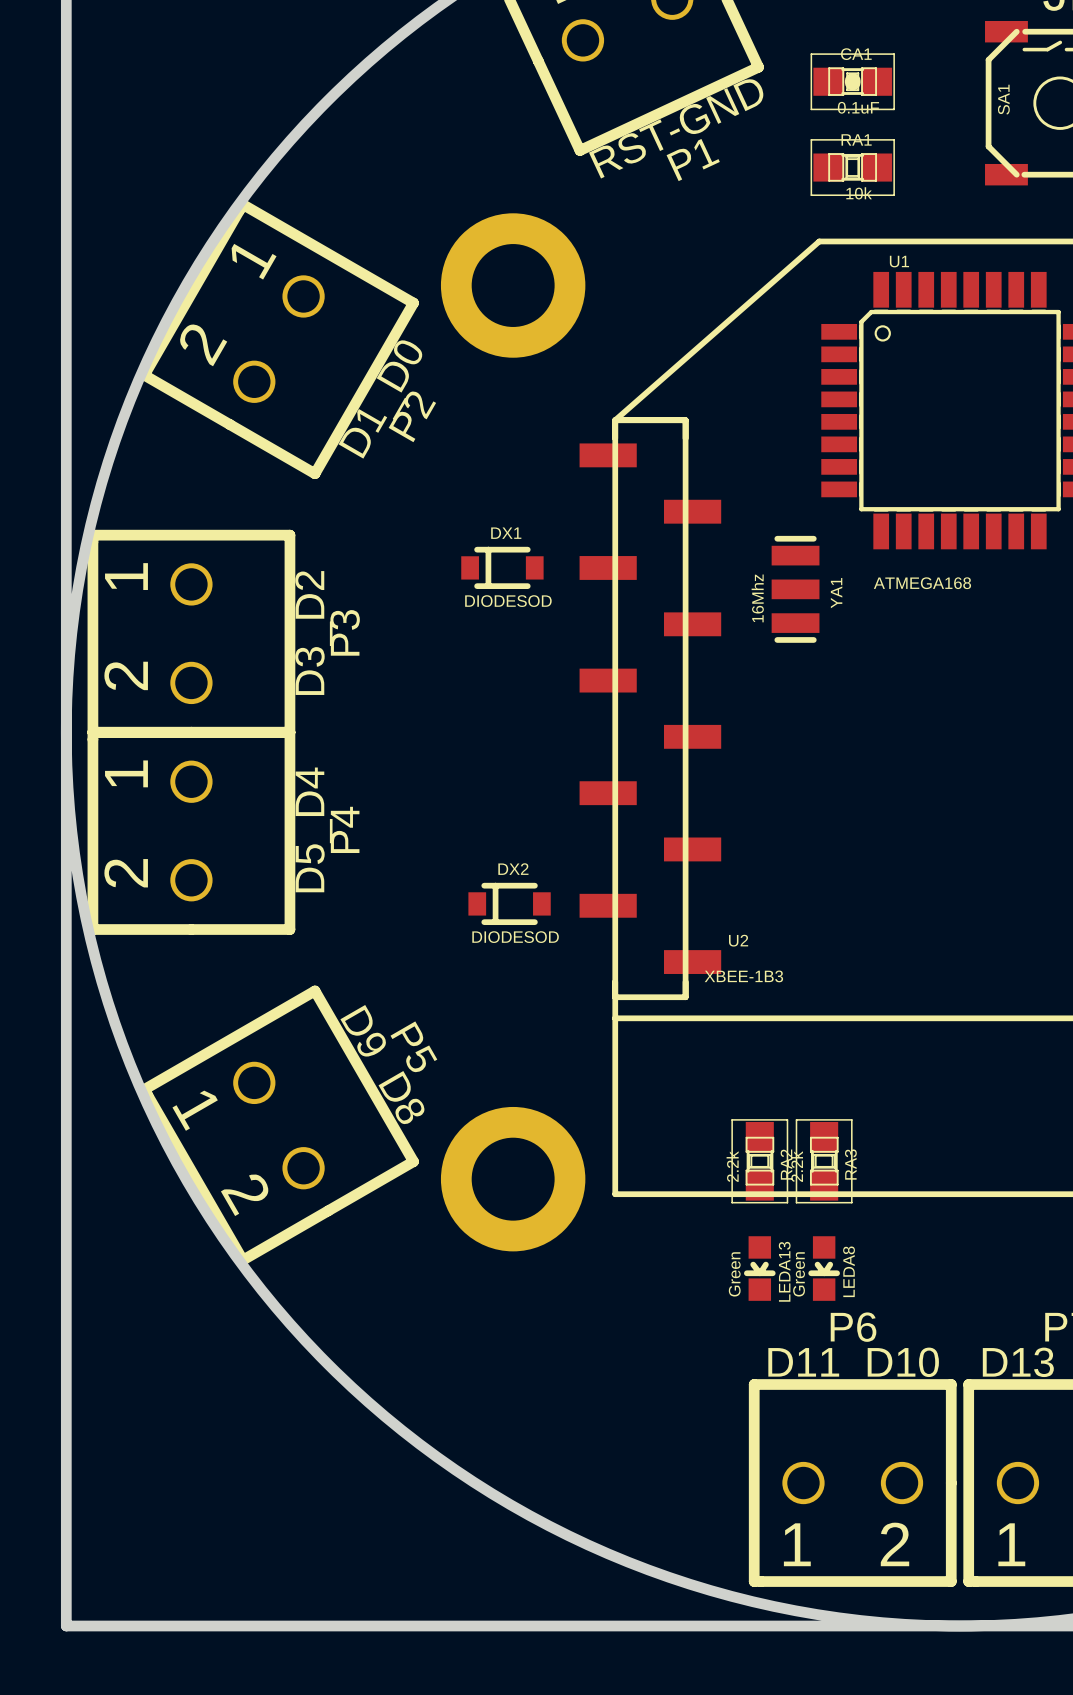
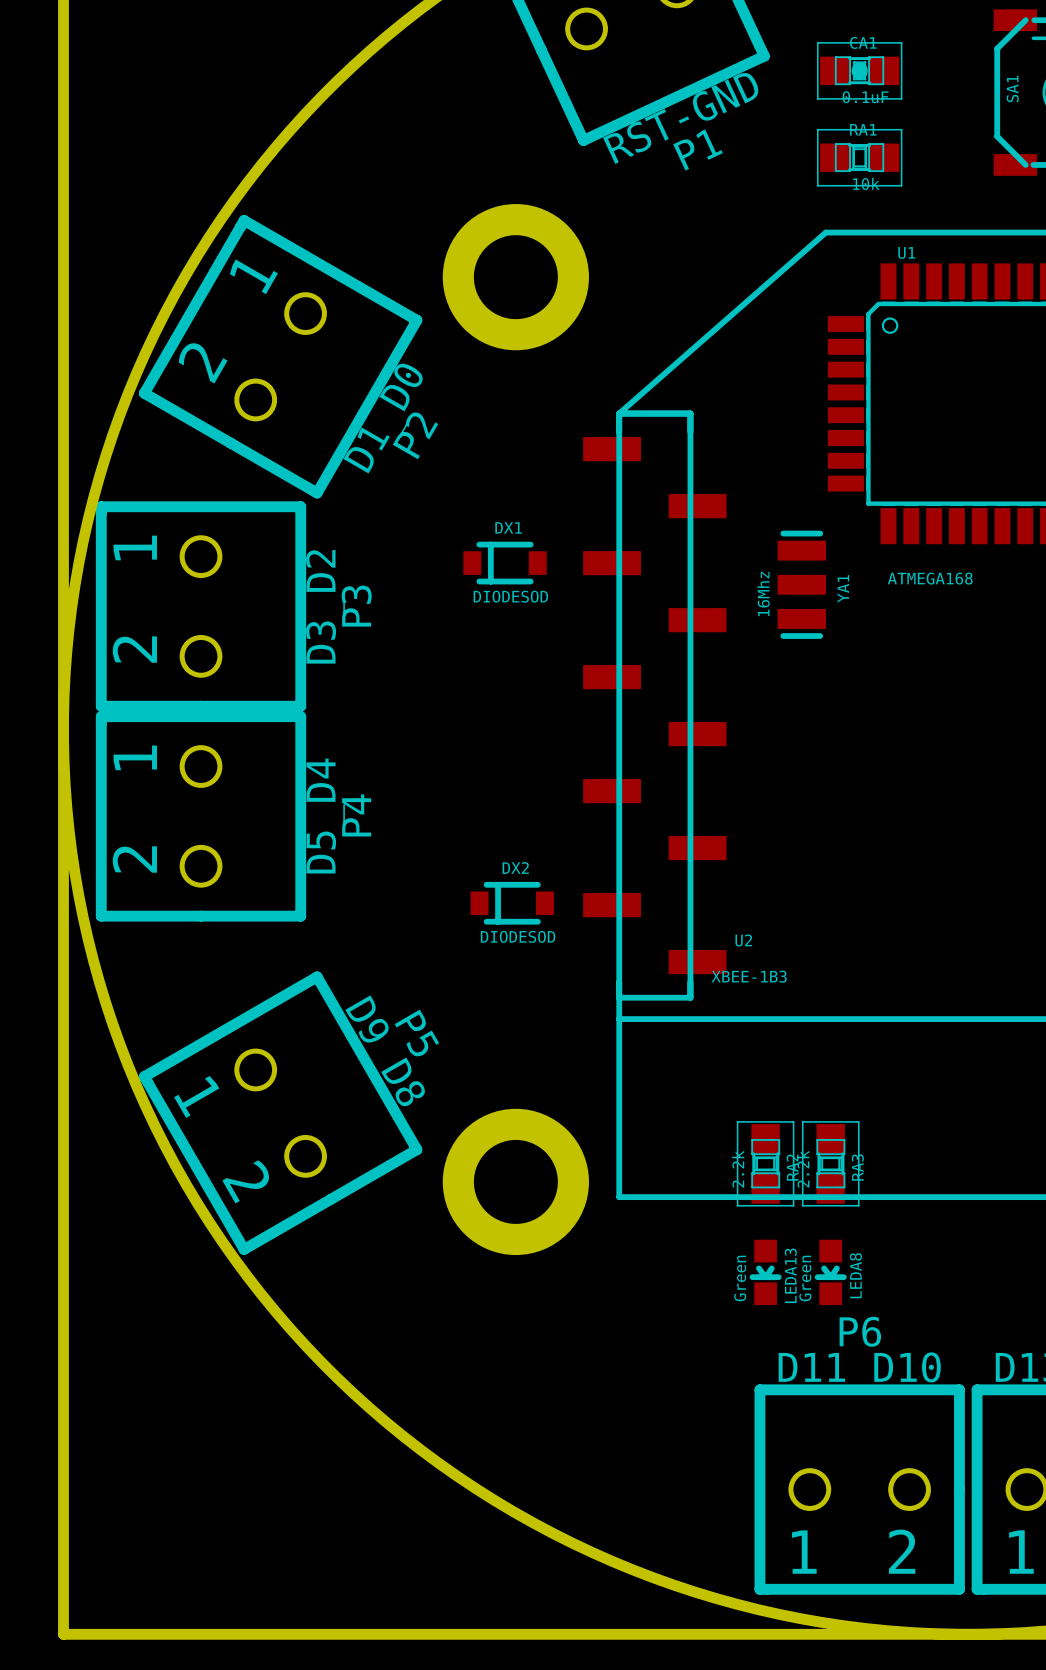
P2 position: (278, 339) -> (280, 356)
P3 position: (191, 633) -> (201, 606)
P4 position: (191, 831) -> (201, 816)
P5 position: (278, 1125) -> (280, 1113)

